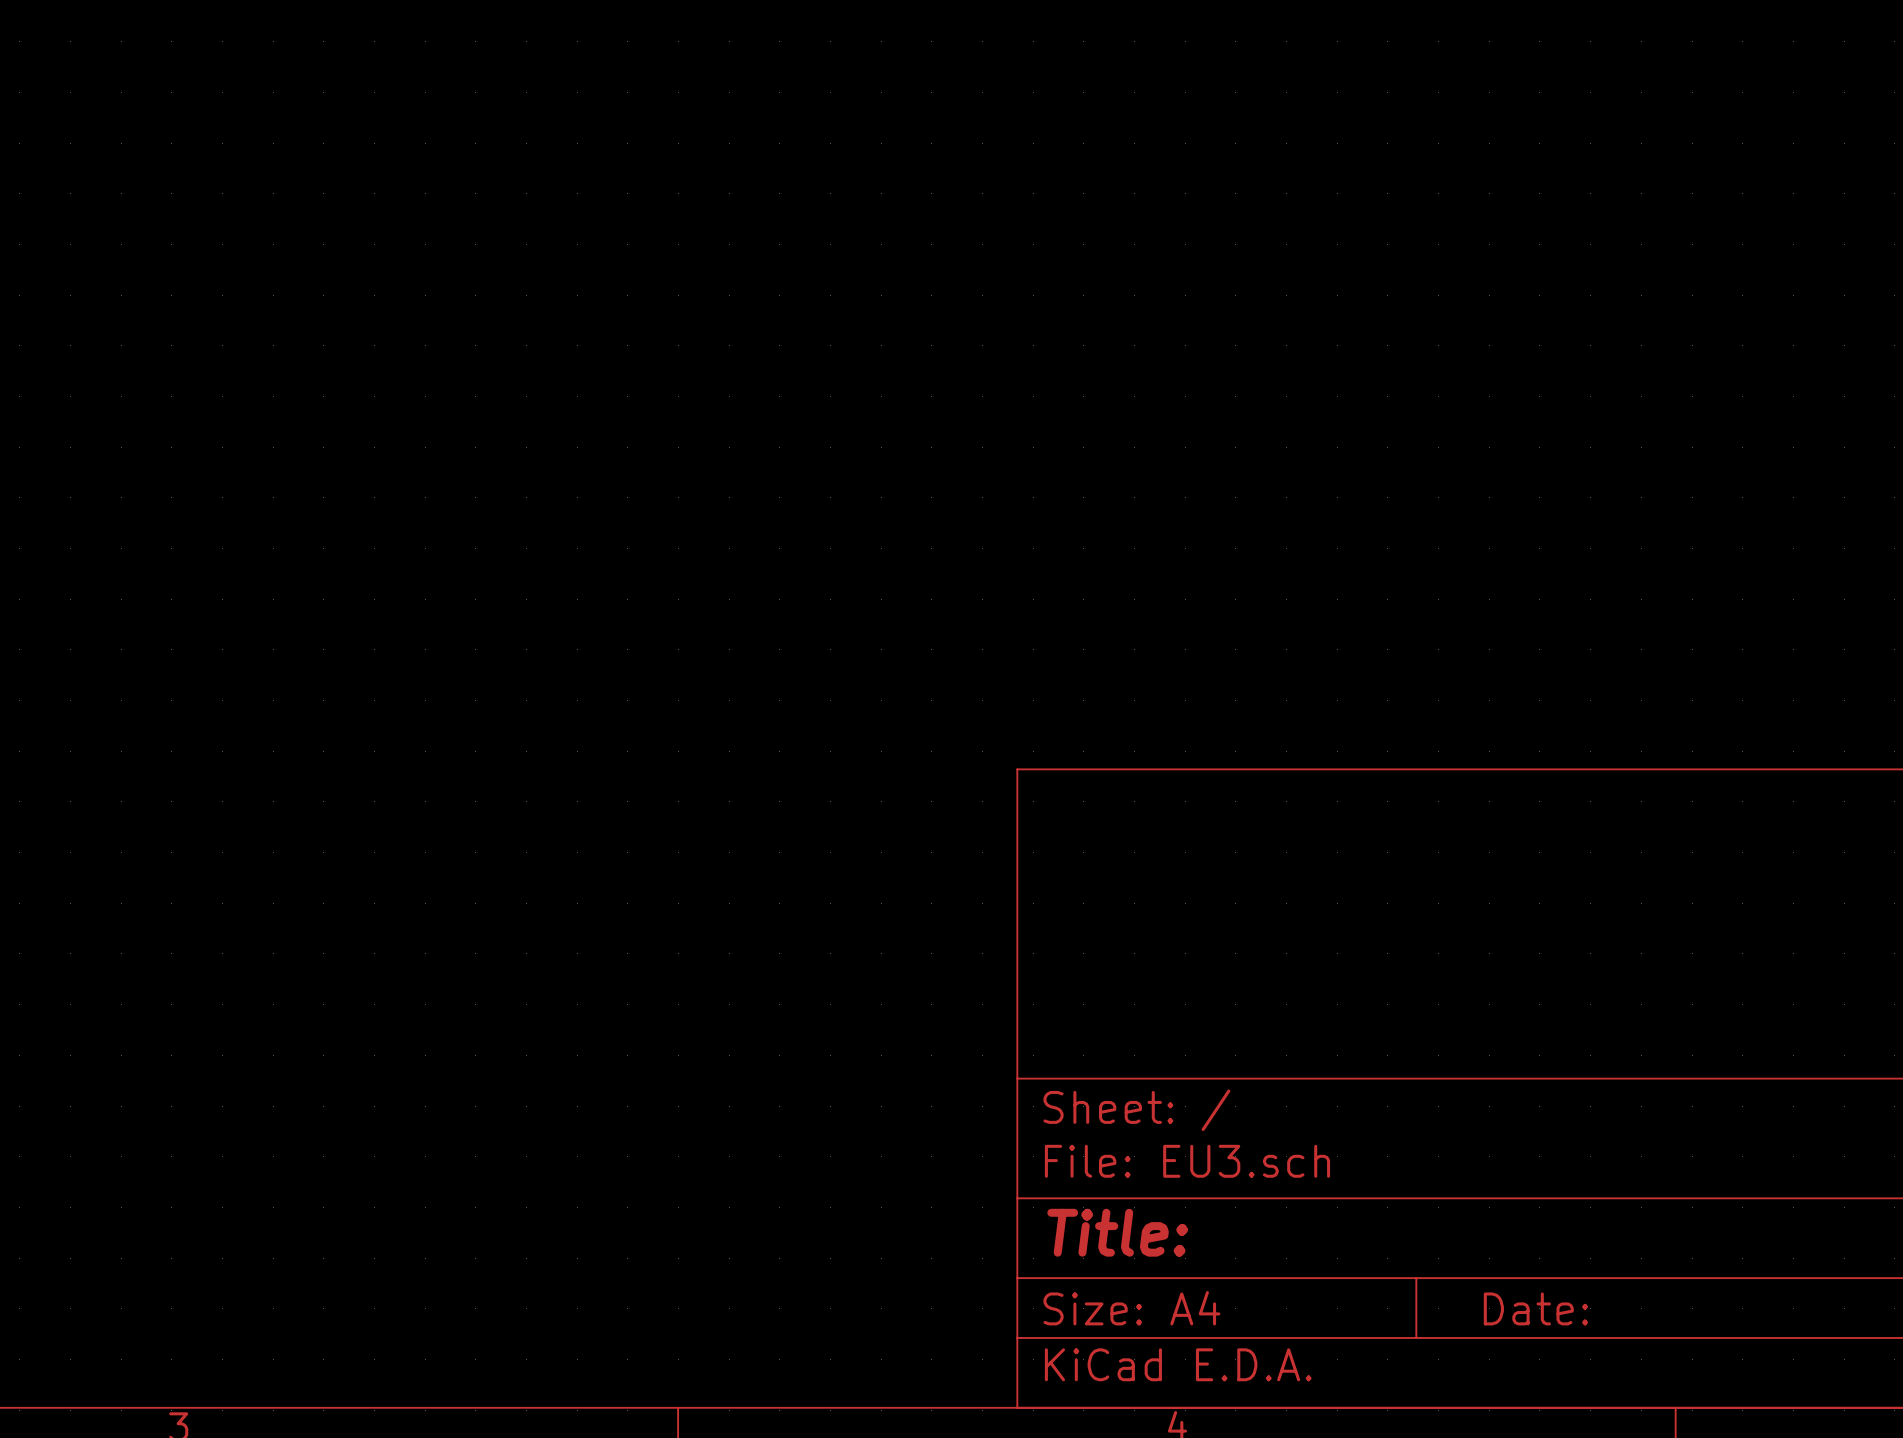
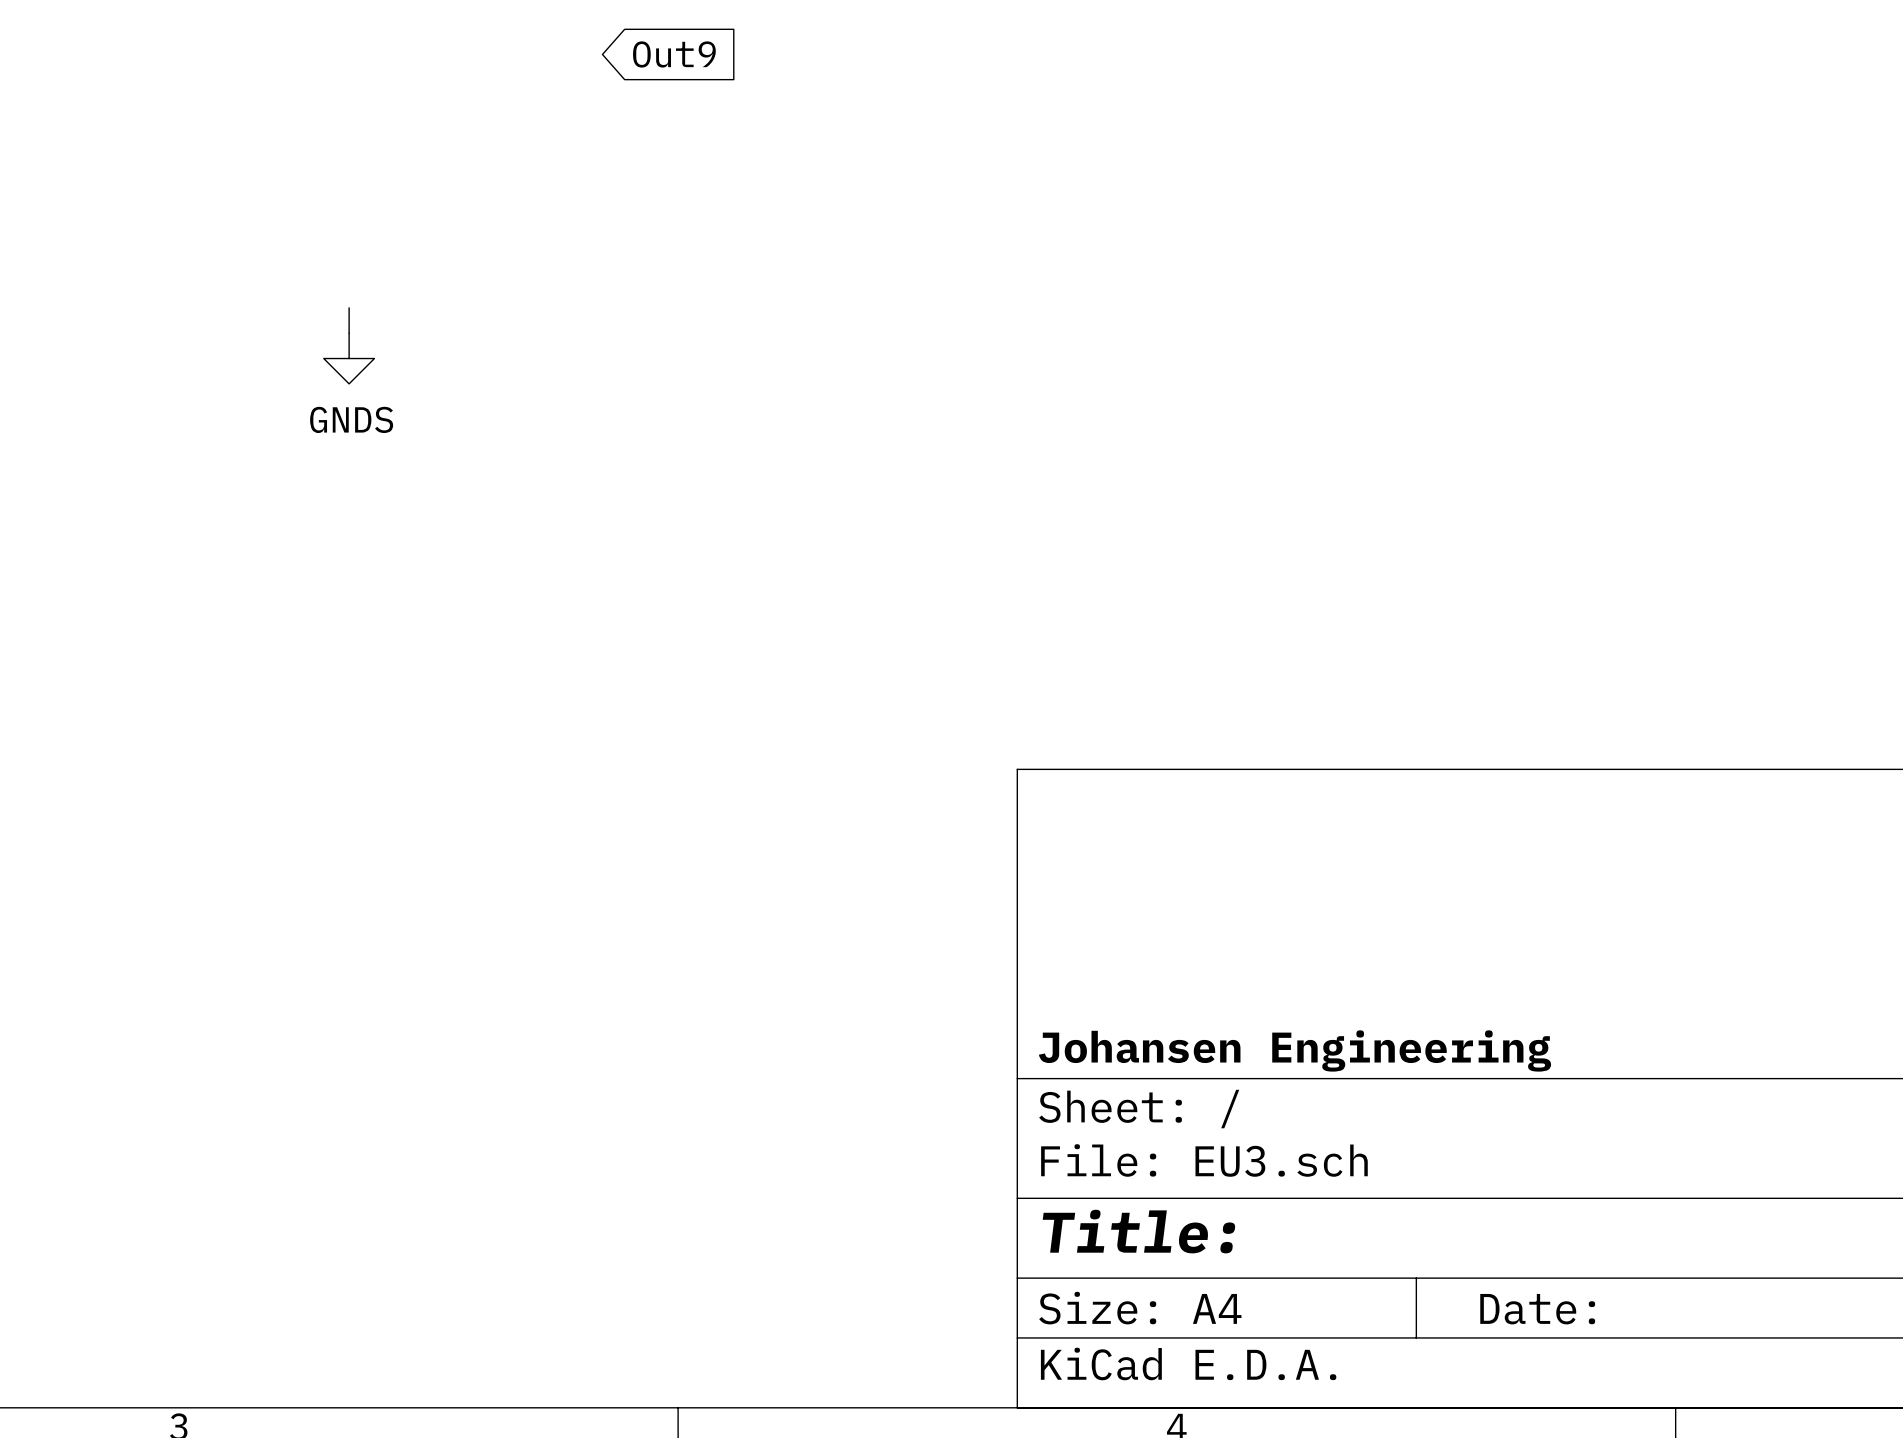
global label: none -> Out9 (674, 54)
wire: none -> (349, 307) (349, 333)
power symbol: none -> GNDS (349, 358)
title block: none -> Johansen Engineering (1294, 1050)

